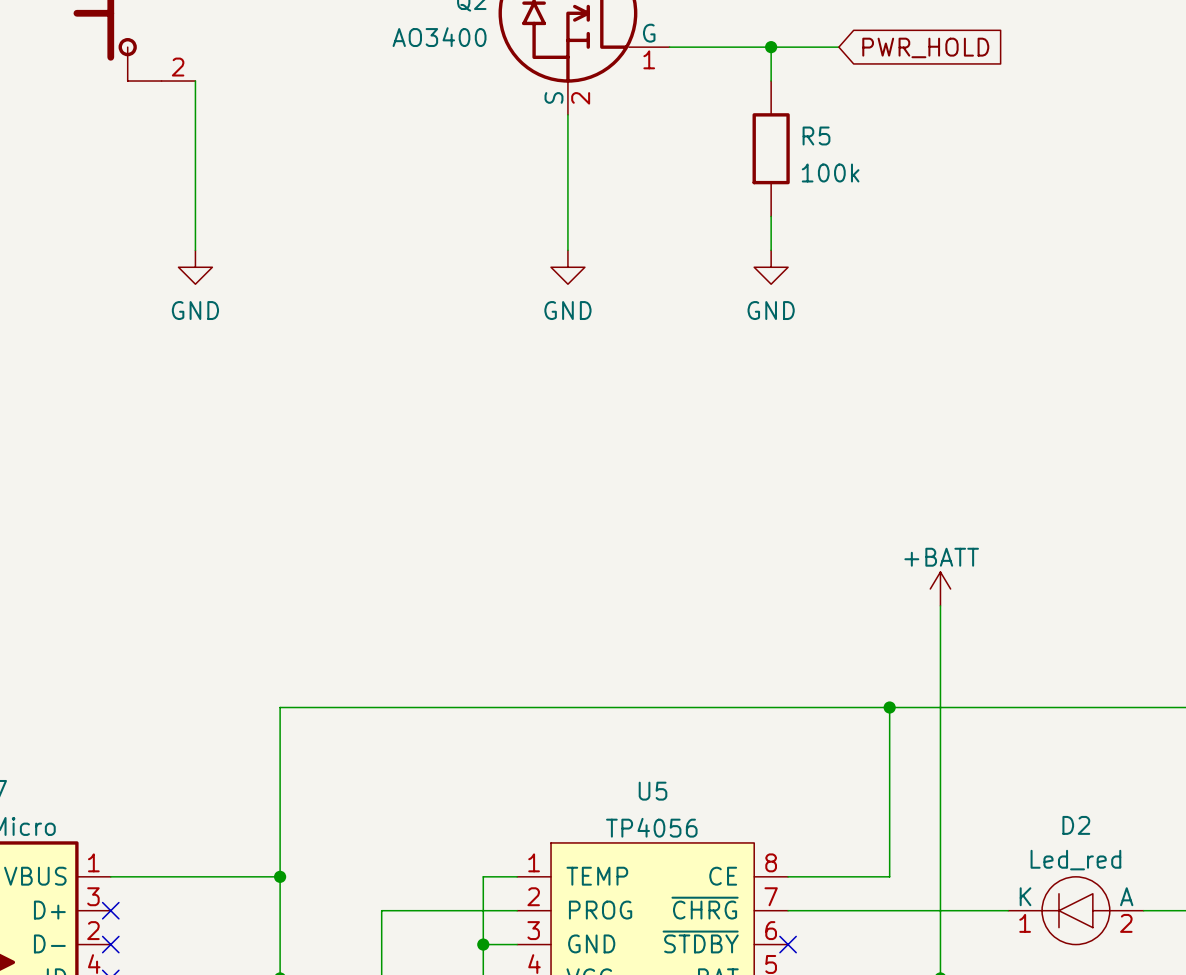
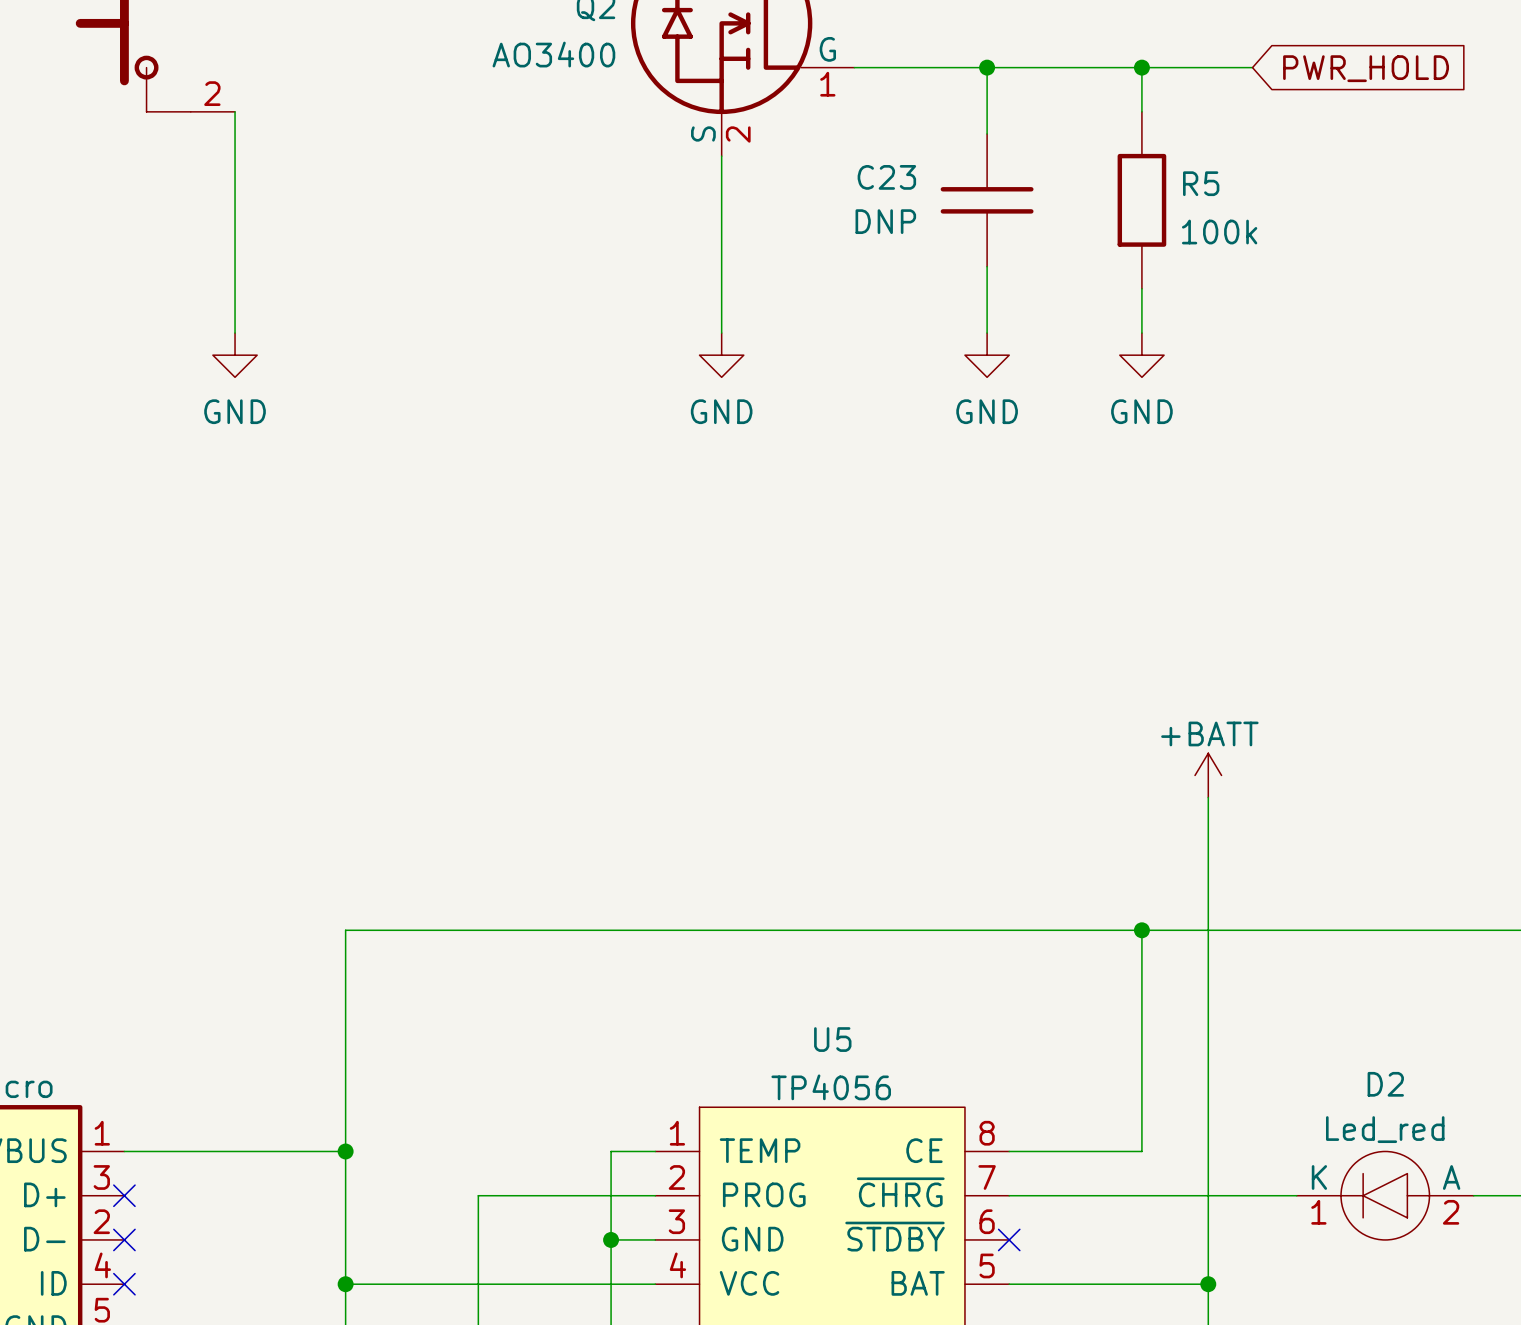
wire: none -> (1075, 67) (1252, 67)
wire: none -> (1141, 67) (1141, 111)
junction: none -> (1141, 67)
global label position: PWR_HOLD (925, 47) -> PWR_HOLD (1366, 68)
R5 position: (771, 148) -> (1141, 200)
C23: none -> DNP (987, 200)
wire: none -> (1141, 288) (1141, 333)
power symbol: none -> GND (1141, 355)

